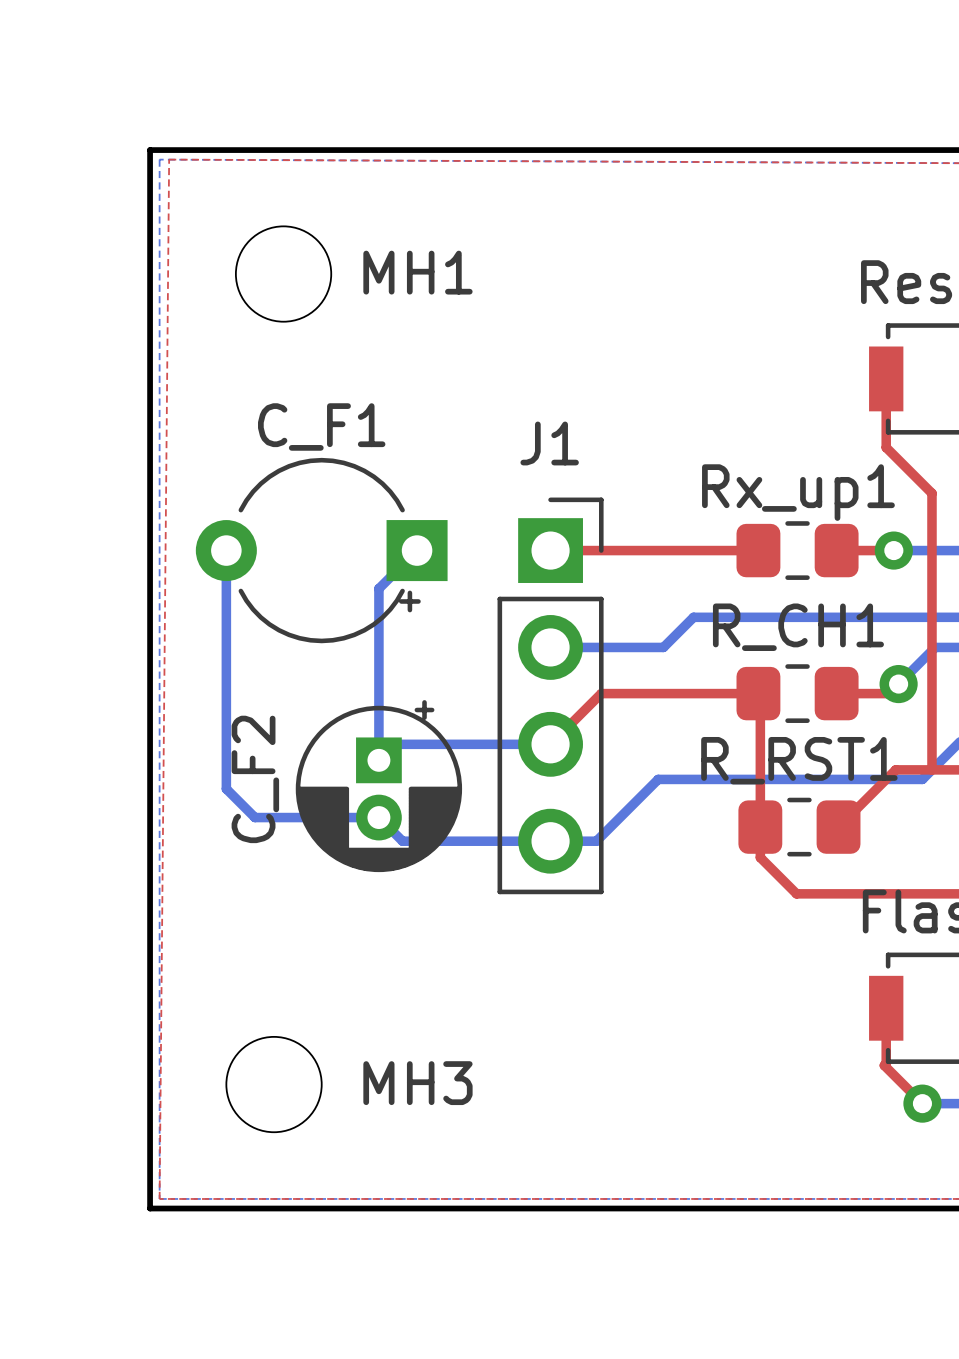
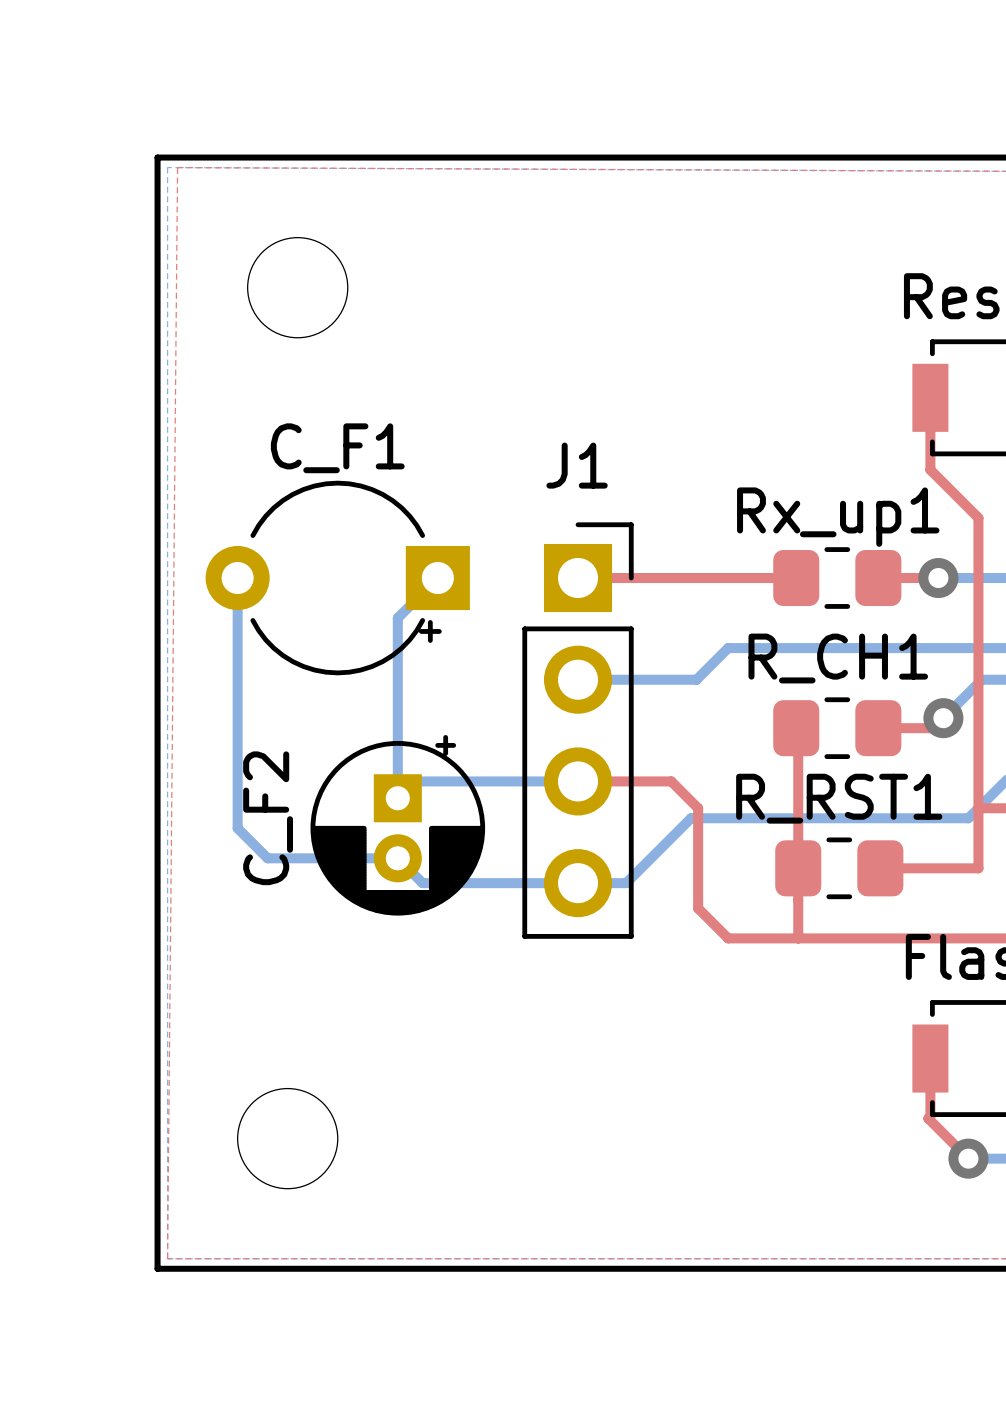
MH1 name: MH1 (417, 272) -> none
top track: (758, 693) (601, 693) (550, 744) -> (836, 938) (728, 938) (698, 908) (698, 808) (671, 781) (578, 781)
top track: (931, 769) (895, 769) (838, 827) -> (978, 808) (978, 868) (880, 868)
top track: (760, 857) (796, 893) -> (798, 900) (798, 938)
MH3 name: MH3 (417, 1083) -> none

